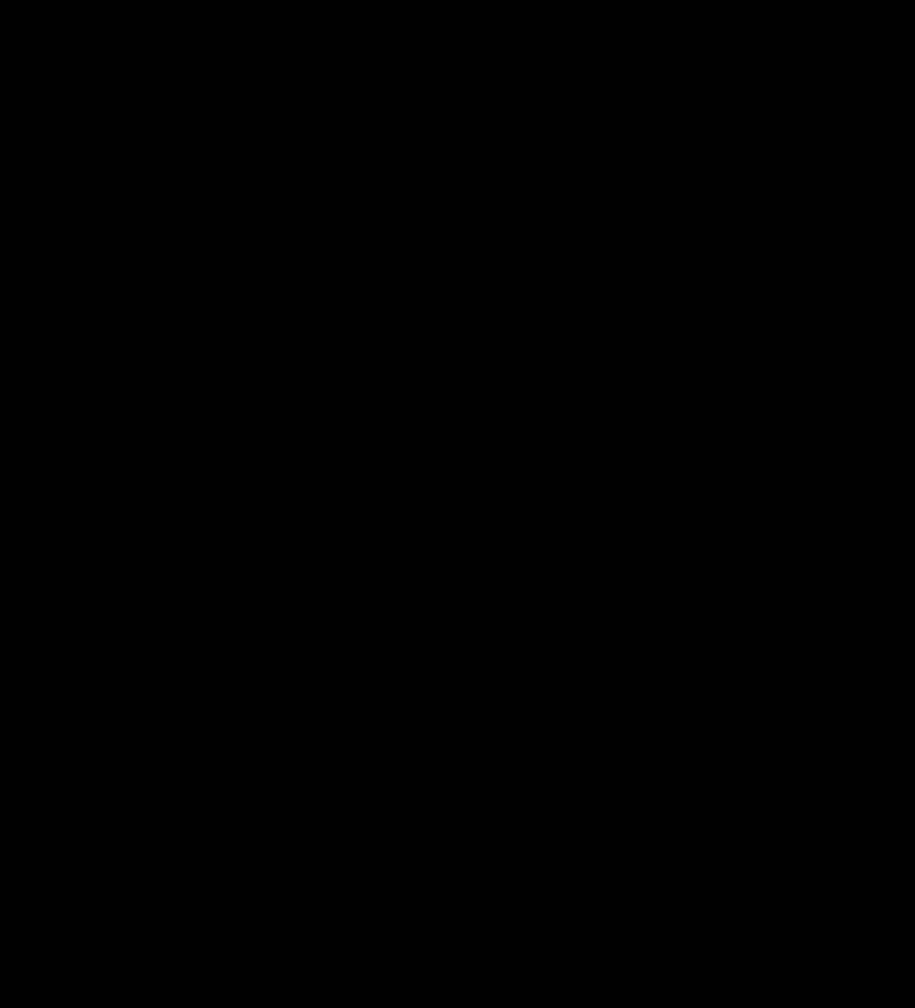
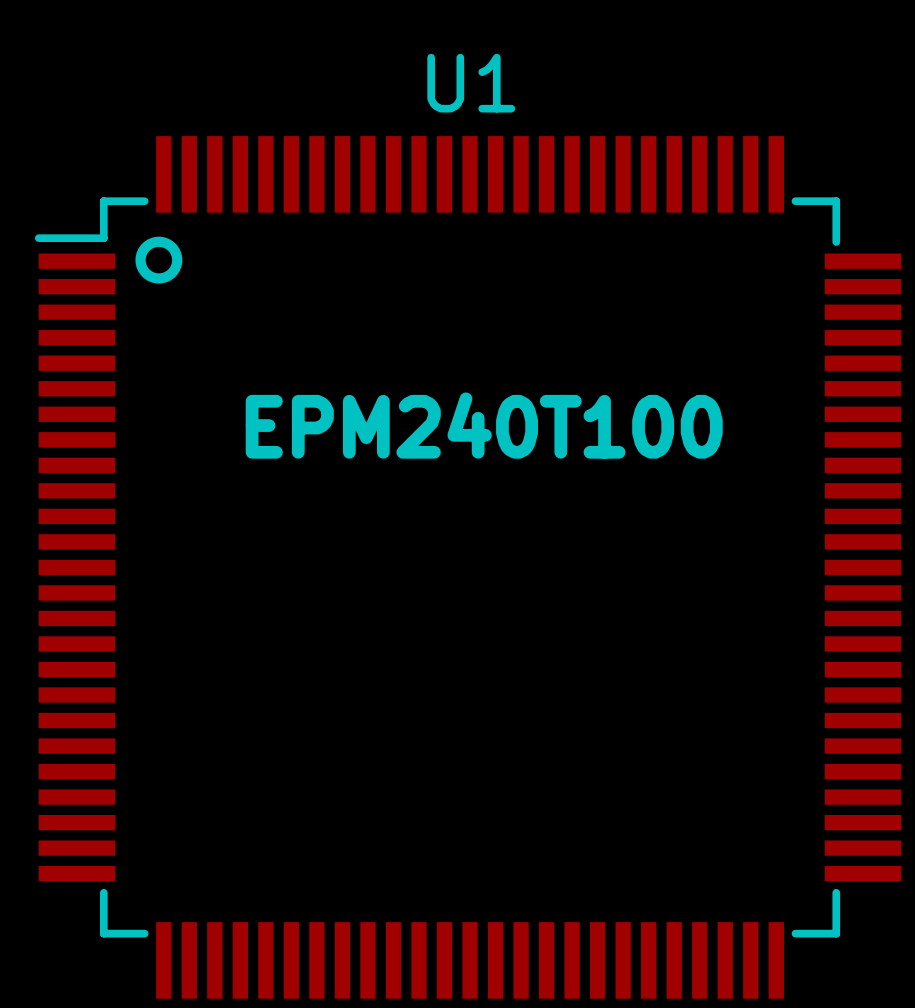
drawing: none -> [135, 236, 183, 284]
text: none -> EPM240T100 (484, 425)
U1: none -> (468, 567)

